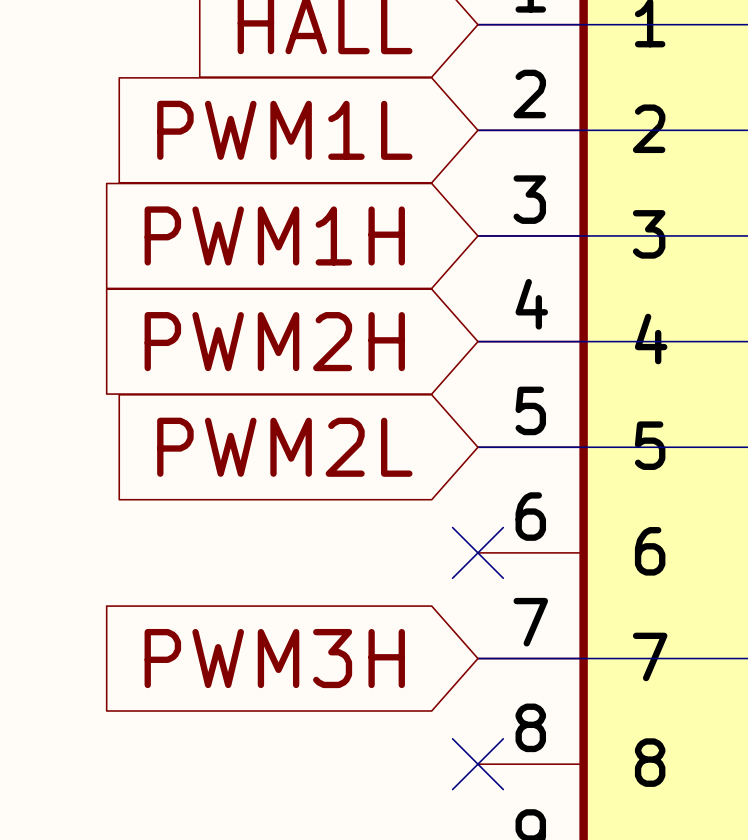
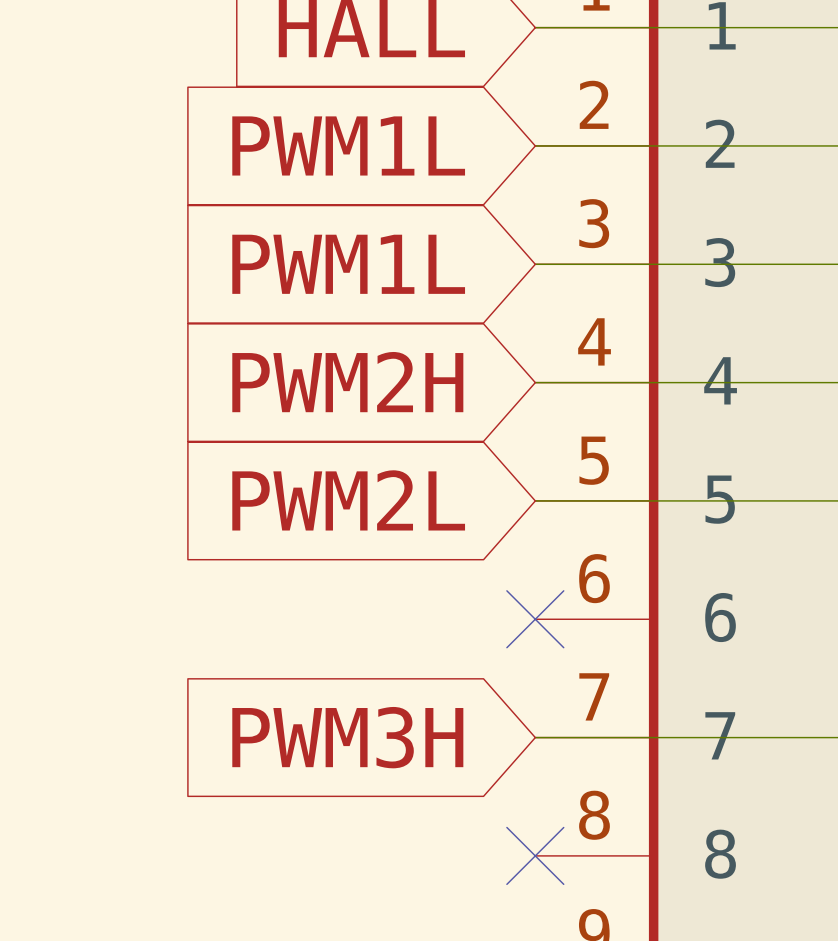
global label: PWM1H (274, 235) -> PWM1L (348, 264)

